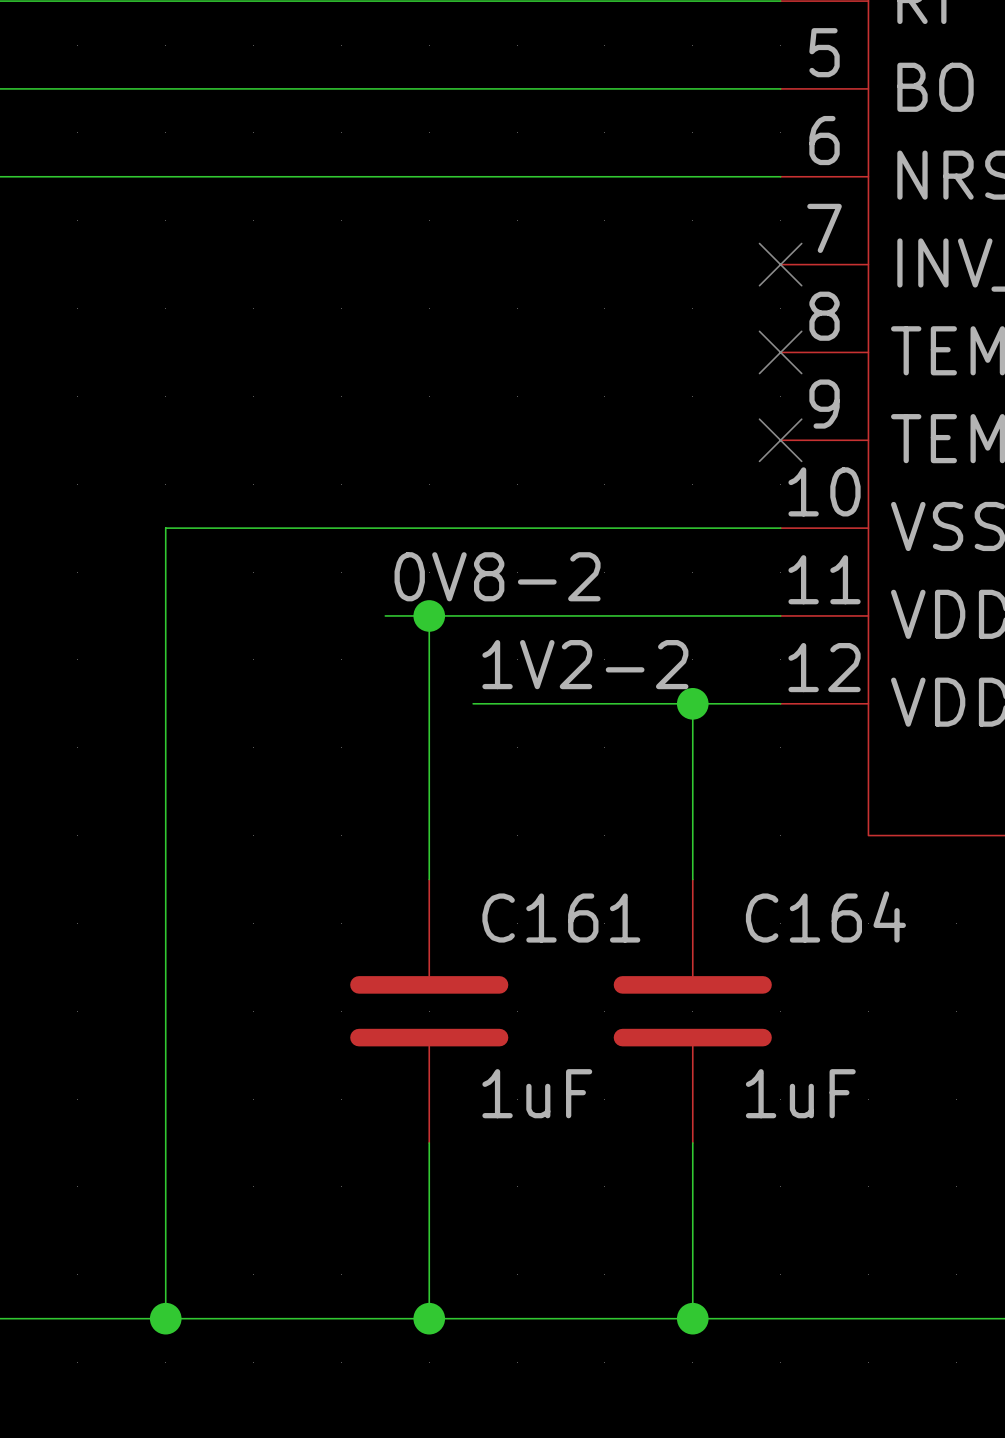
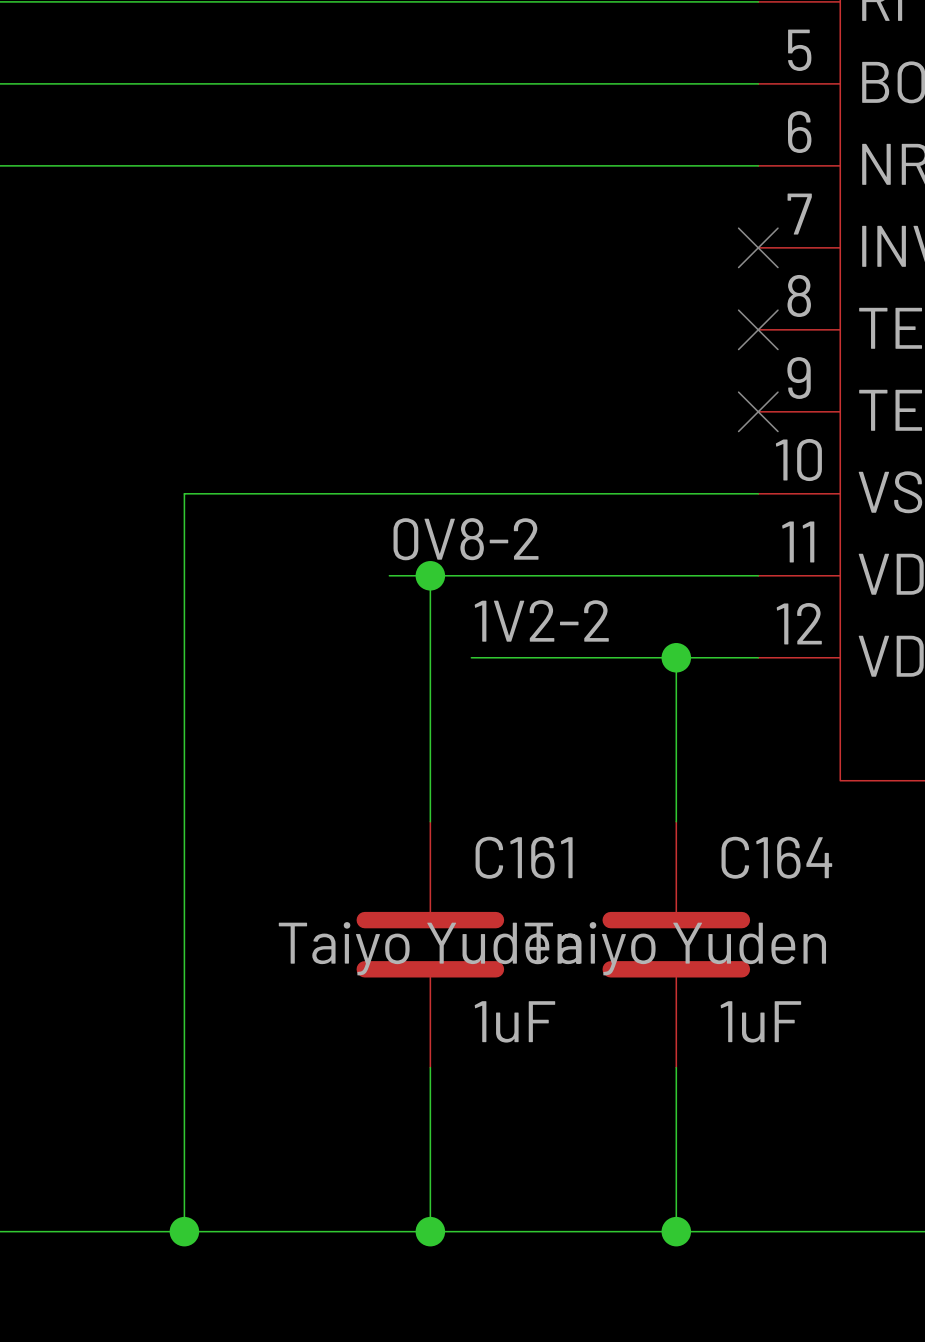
C161 text: none -> Taiyo Yuden (429, 948)
C164 text: none -> Taiyo Yuden (675, 948)

